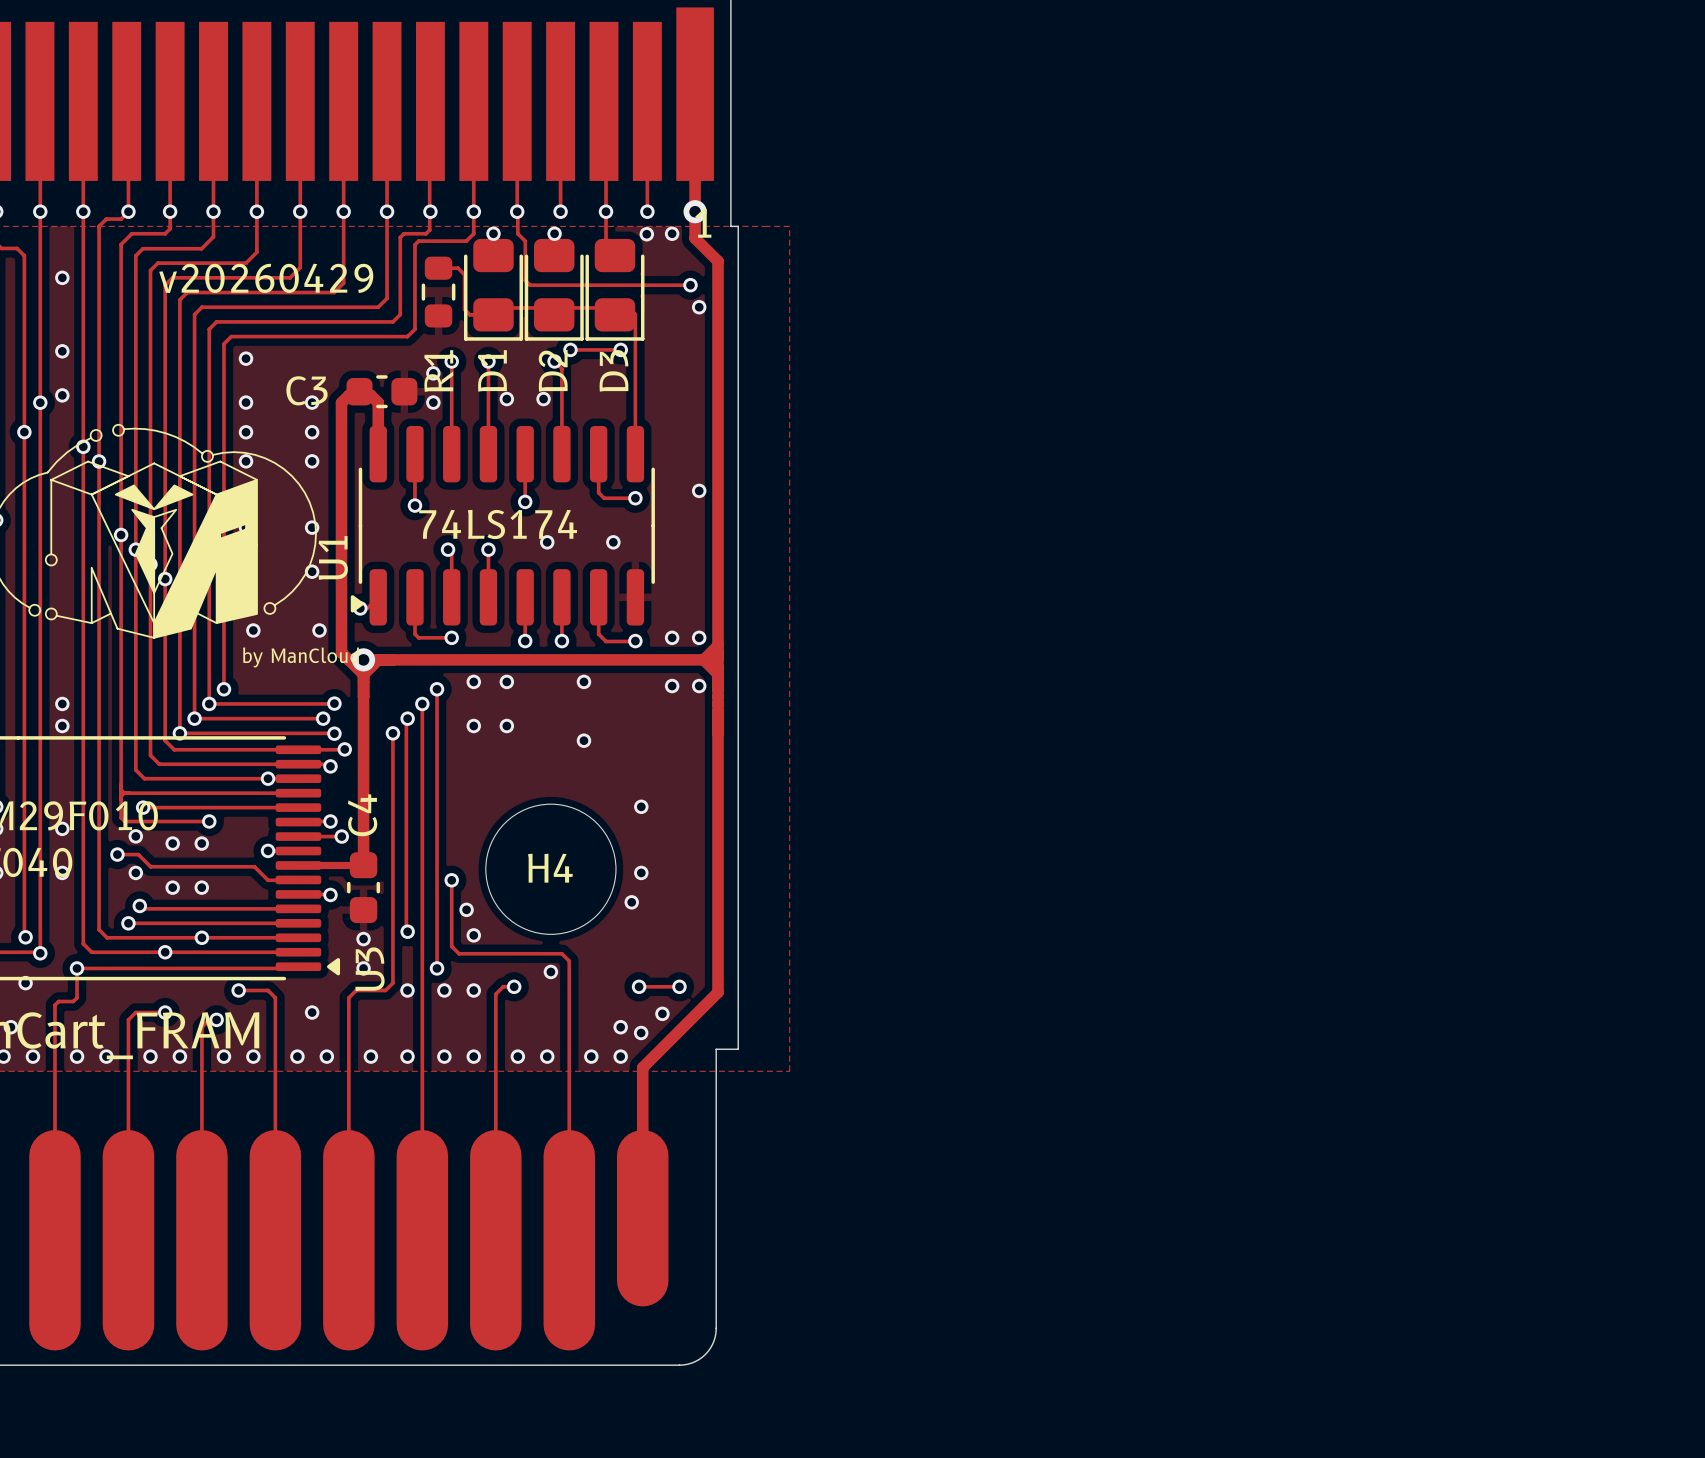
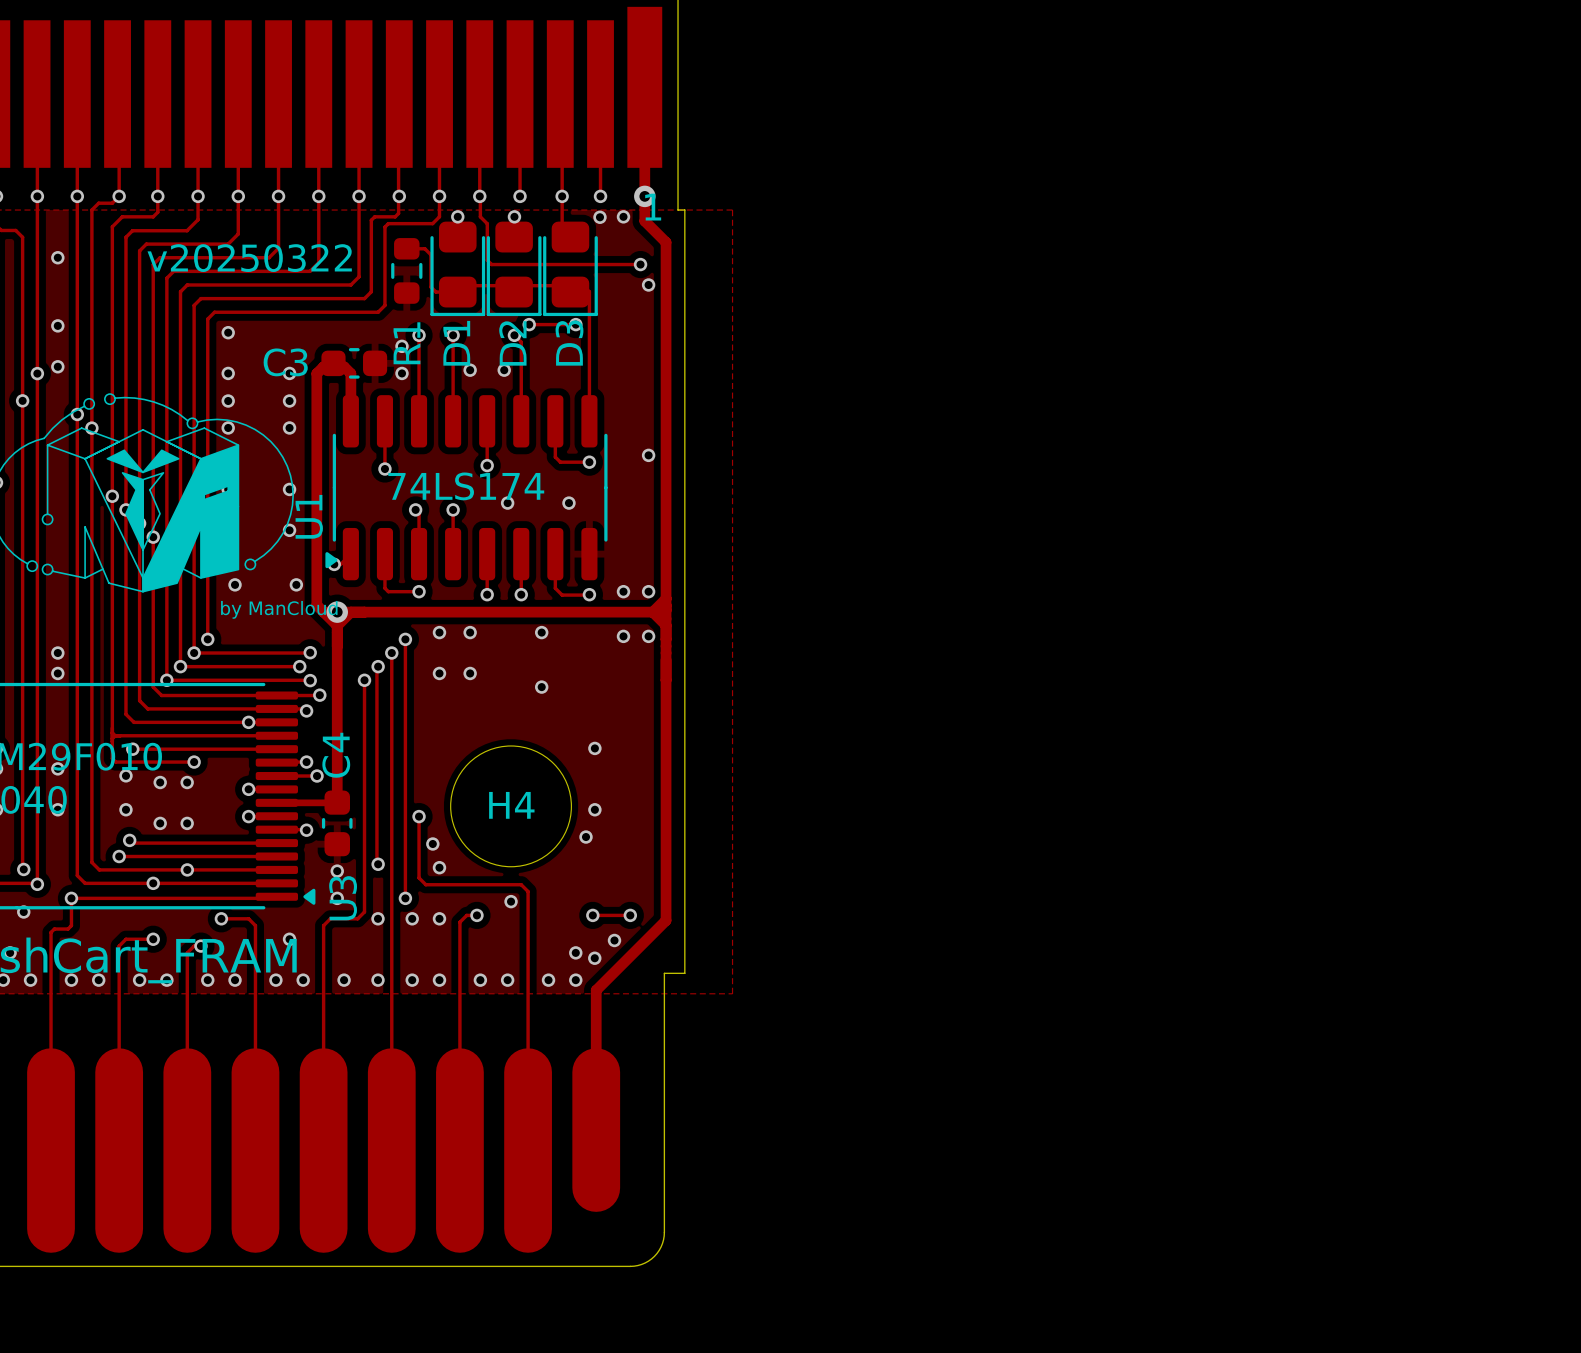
text: v20260429 (266, 278) -> v20250322 (249, 258)
track: (117, 854) (138, 854) (150, 866) (254, 866) (268, 880) -> none
via position: (117, 854) -> (248, 816)

